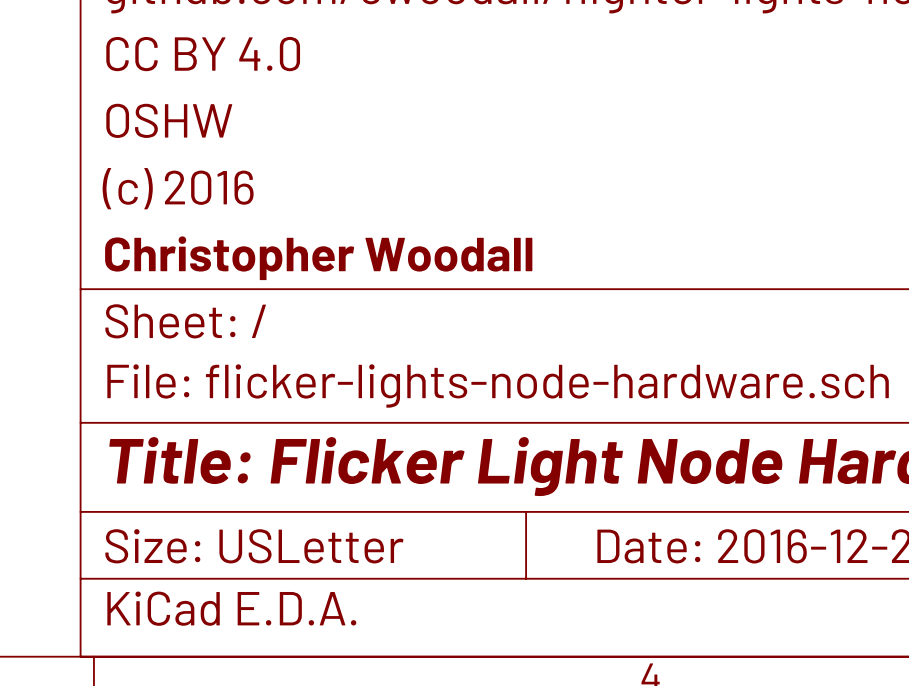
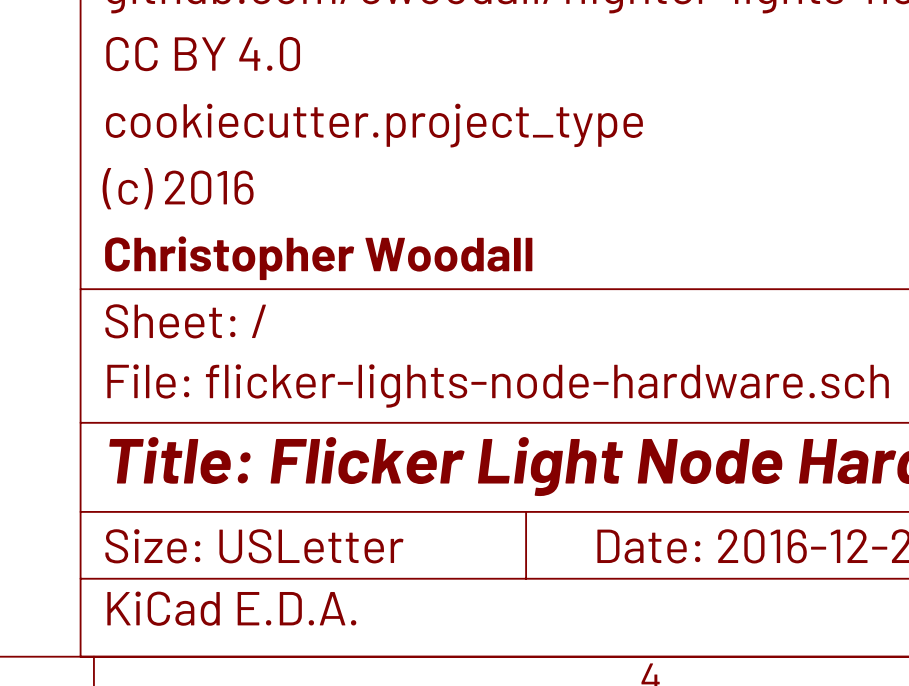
title block: OSHW (169, 120) -> cookiecutter.project_type (374, 125)

